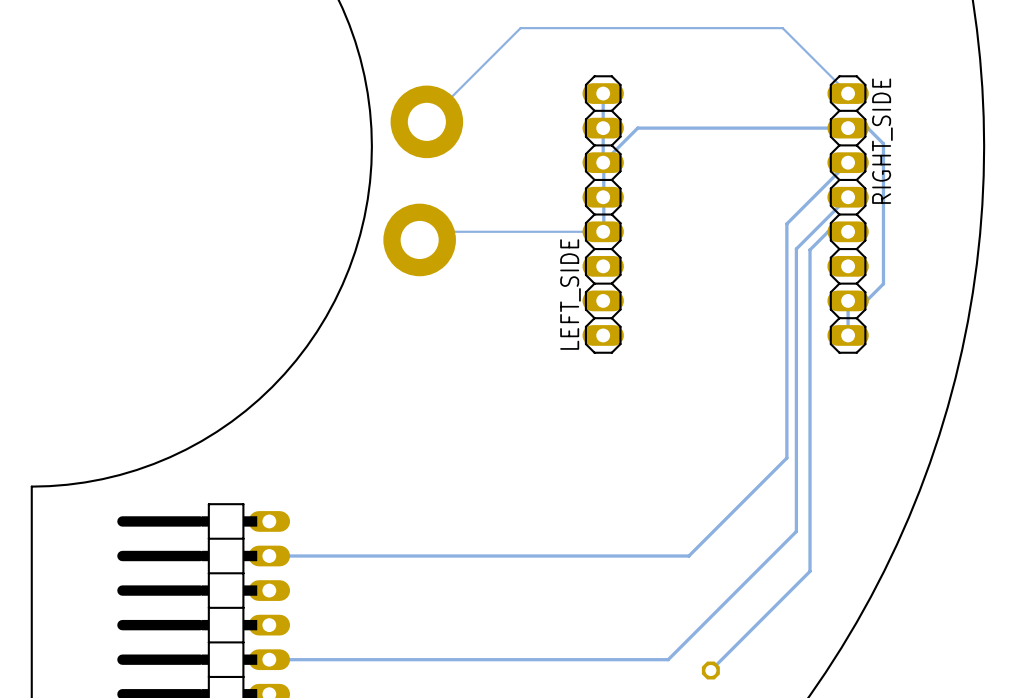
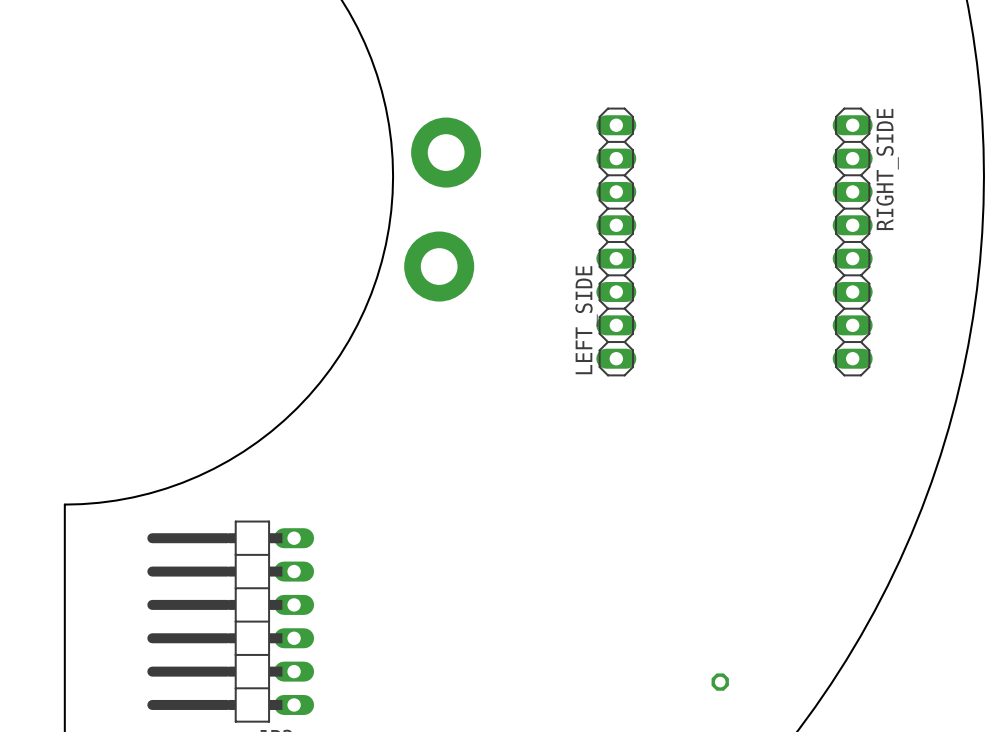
track: (603, 93) (603, 162) (637, 128) (867, 128) (883, 143) (883, 283) (866, 300) (848, 300) (848, 335) -> none
track: (848, 93) (782, 28) (520, 28) (426, 121) -> none
track: (603, 162) (603, 231) (427, 231) (419, 239) -> none
track: (848, 162) (786, 223) (786, 458) (688, 556) (269, 556) -> none
track: (848, 197) (796, 248) (796, 531) (668, 659) (269, 659) -> none
track: (848, 231) (828, 231) (810, 249) (810, 571) (710, 670) -> none

